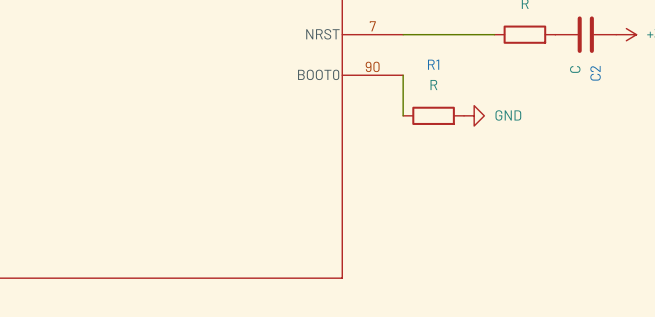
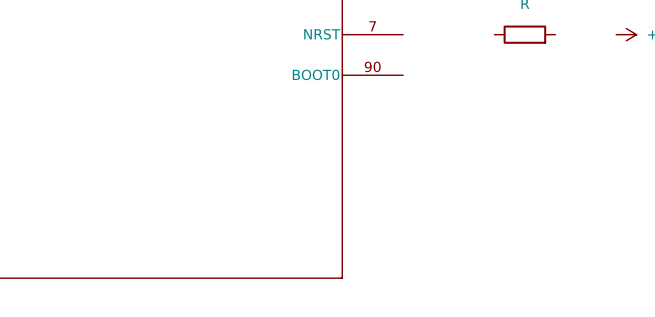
wire: (403, 34) (494, 34) -> none
C2: C (585, 34) -> none
wire: (403, 75) (403, 115) -> none
R1: R (433, 115) -> none
power symbol: GND (474, 115) -> none

